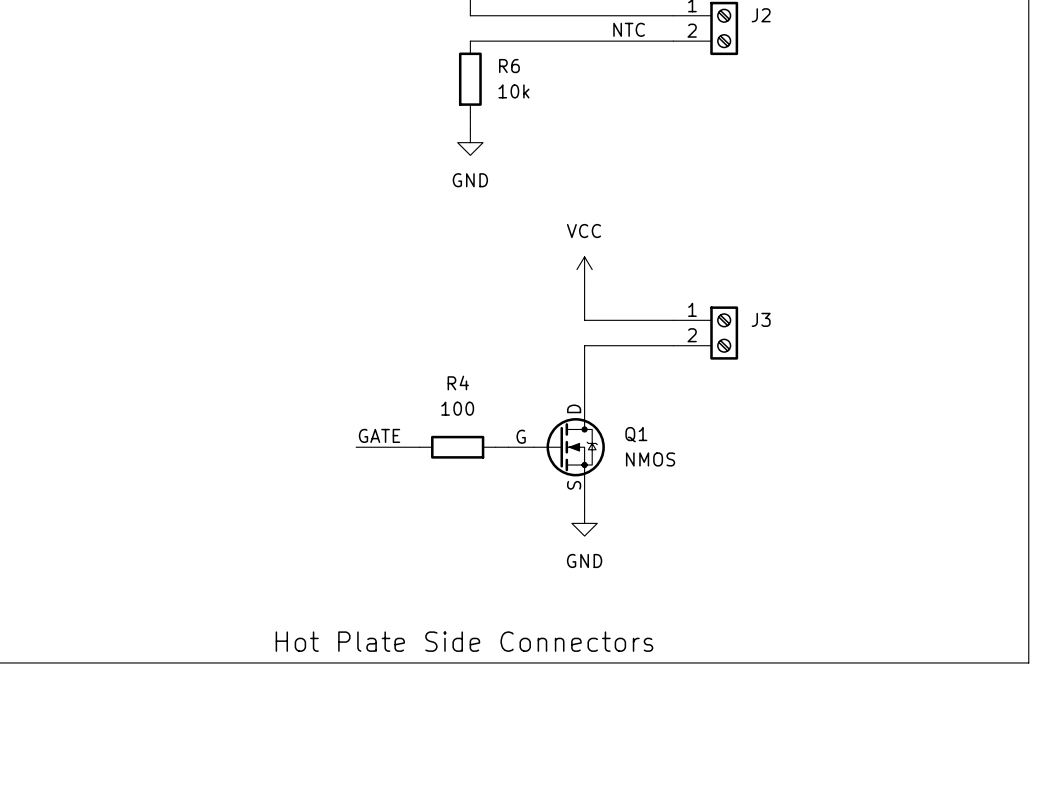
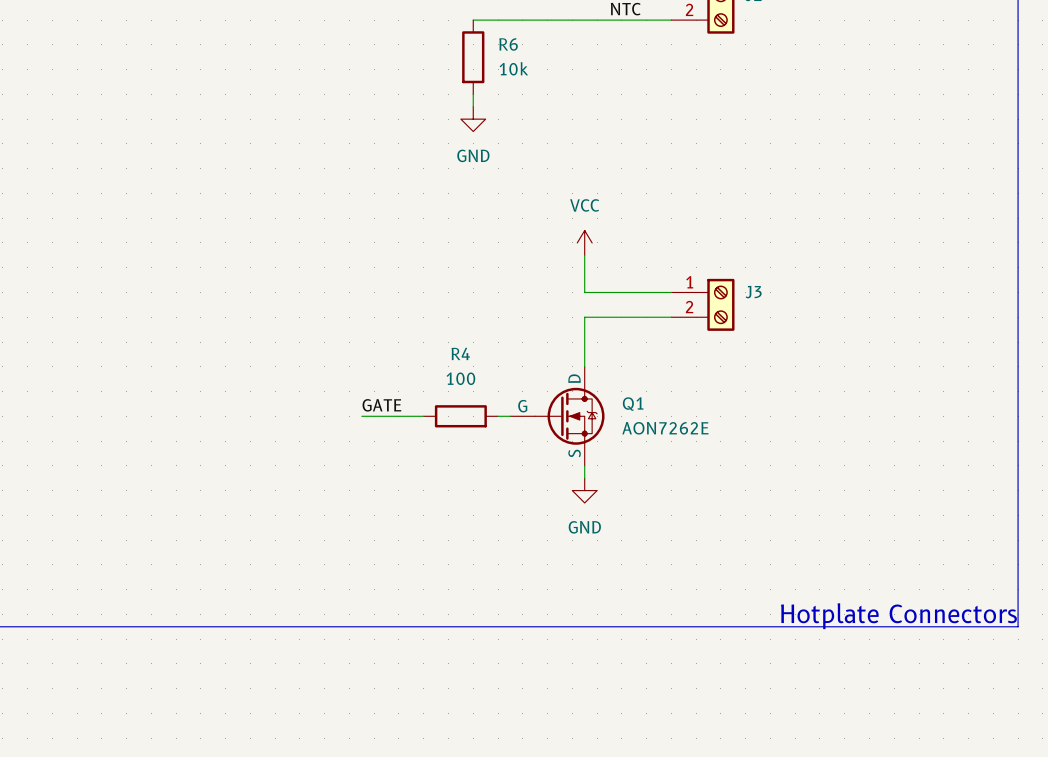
Q1 value: NMOS (650, 459) -> AON7262E (665, 428)
text: Hot Plate Side Connectors (464, 641) -> none
text: none -> Hotplate Connectors (898, 616)

